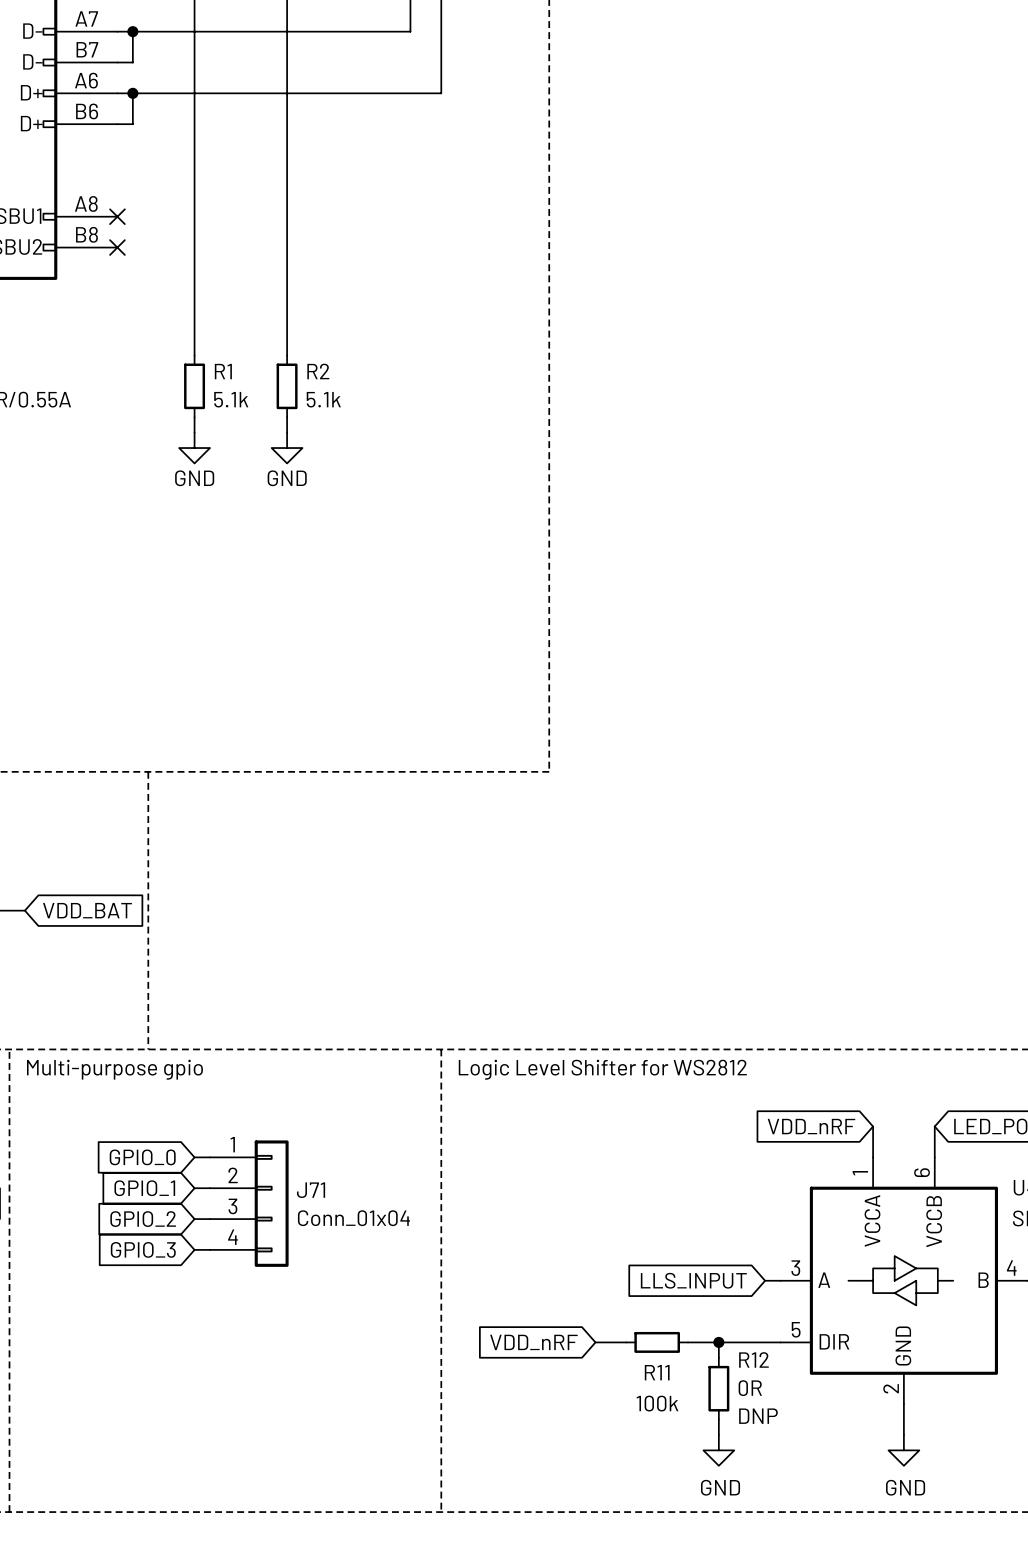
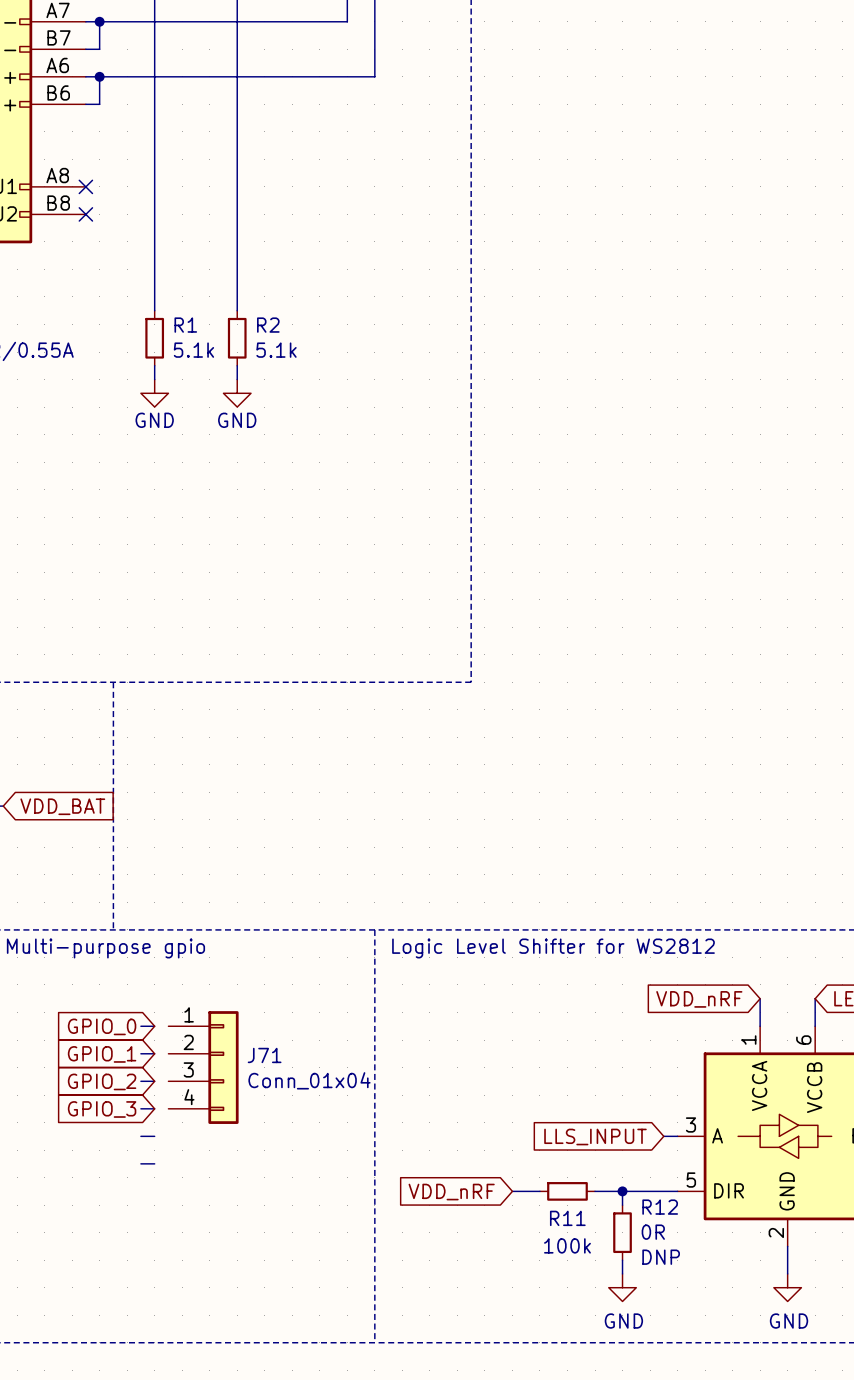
wire: (194, 1157) (209, 1157) -> (154, 1026) (140, 1026)
wire: (194, 1188) (209, 1188) -> (154, 1053) (140, 1053)
wire: (194, 1219) (209, 1219) -> (154, 1081) (140, 1081)
wire: (194, 1249) (209, 1249) -> (154, 1108) (140, 1108)
wire: none -> (140, 1136) (154, 1136)
wire: none -> (140, 1163) (154, 1163)

